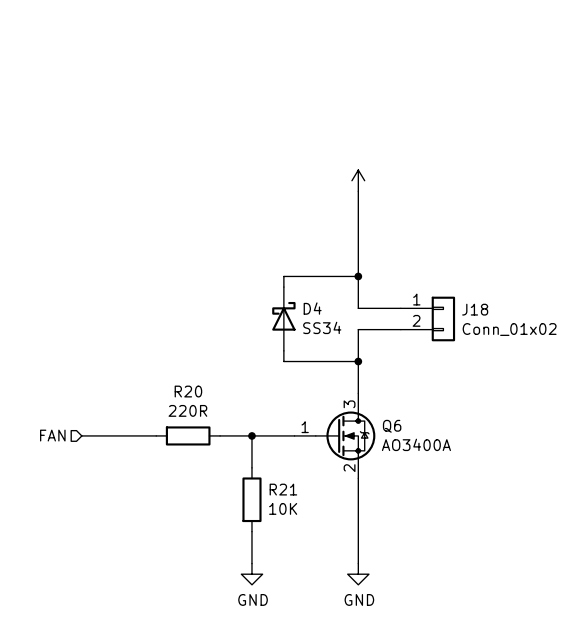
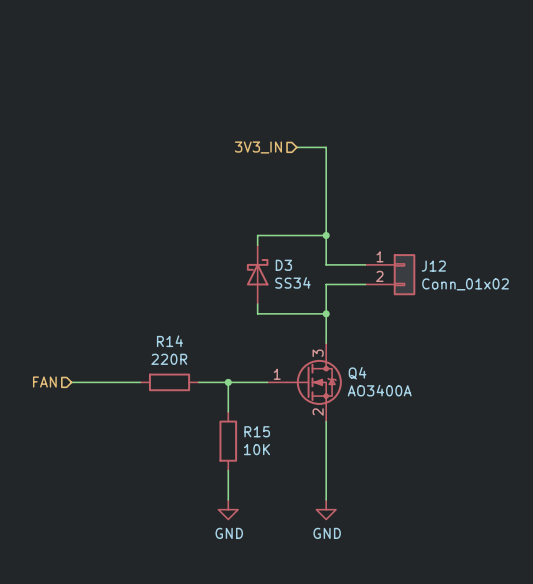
hierarchical label: none -> 3V3_IN (258, 147)
wire: none -> (296, 147) (326, 147) (326, 157)
power symbol: (358, 180) -> none
D4 name: D4 (312, 308) -> D3 (283, 265)
J18 name: J18 (475, 309) -> J12 (433, 266)
R20 name: R20 (188, 391) -> R14 (169, 341)
Q6 name: Q6 (392, 426) -> Q4 (357, 373)
R21 name: R21 (283, 489) -> R15 (257, 431)

